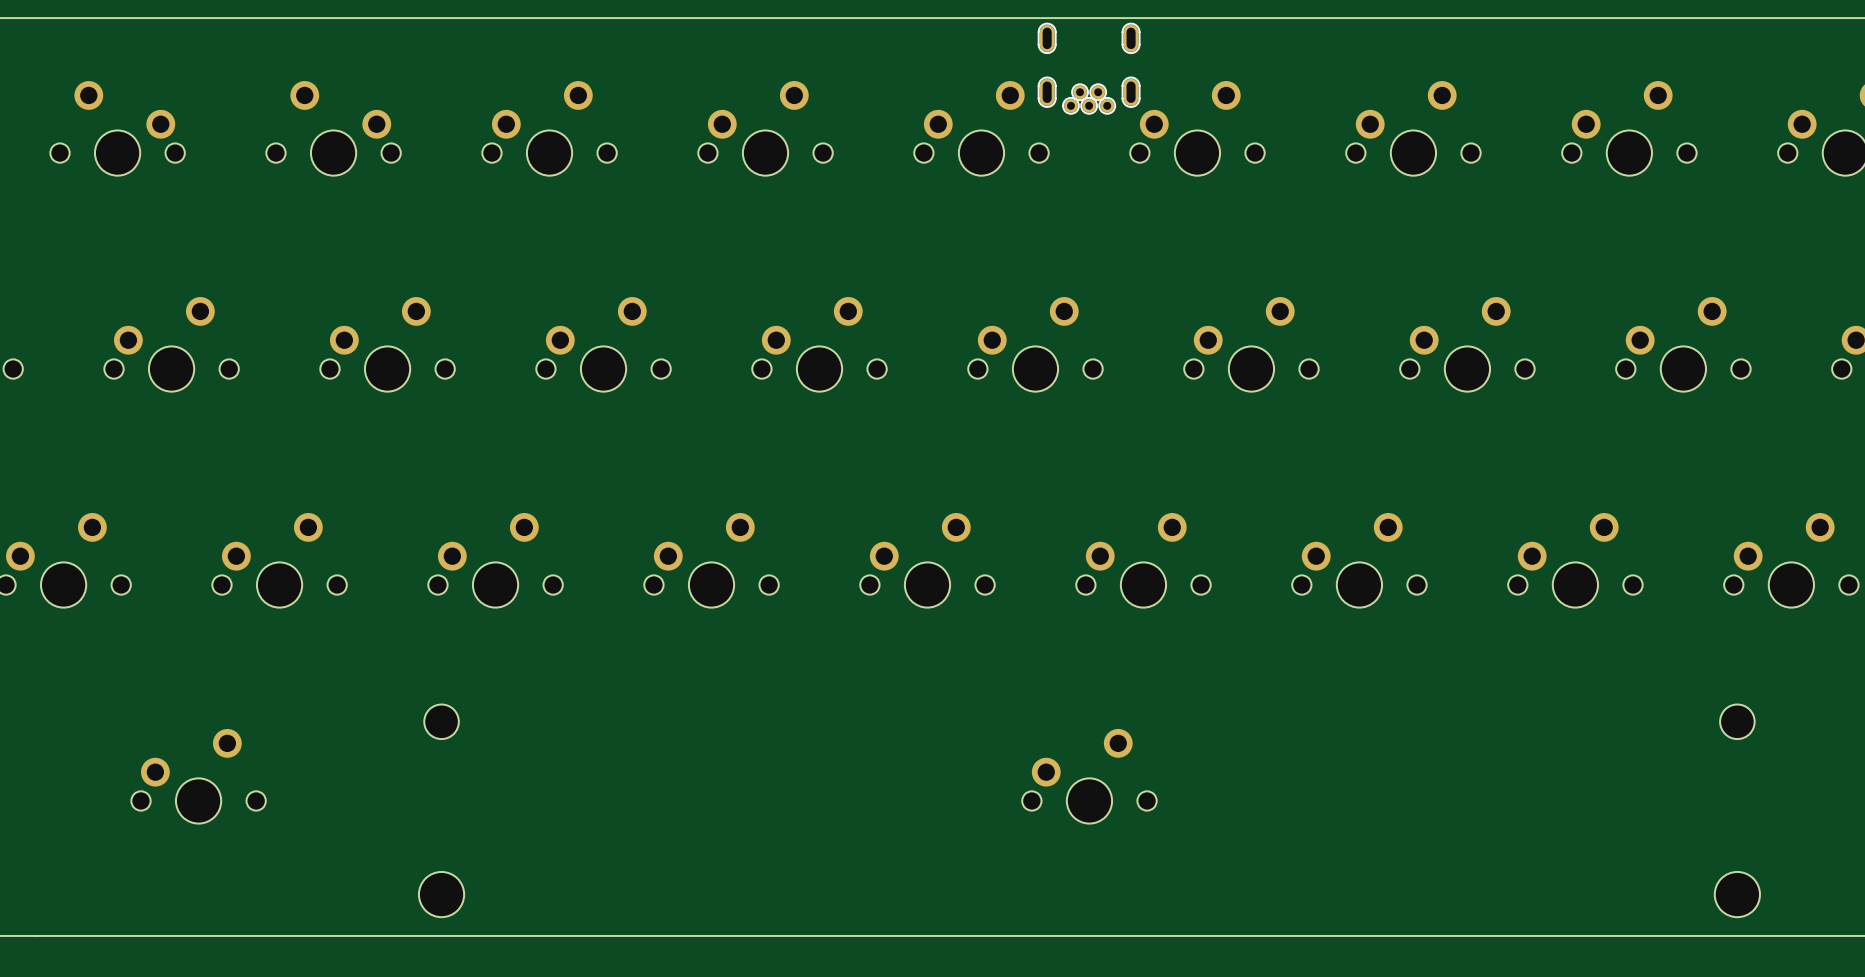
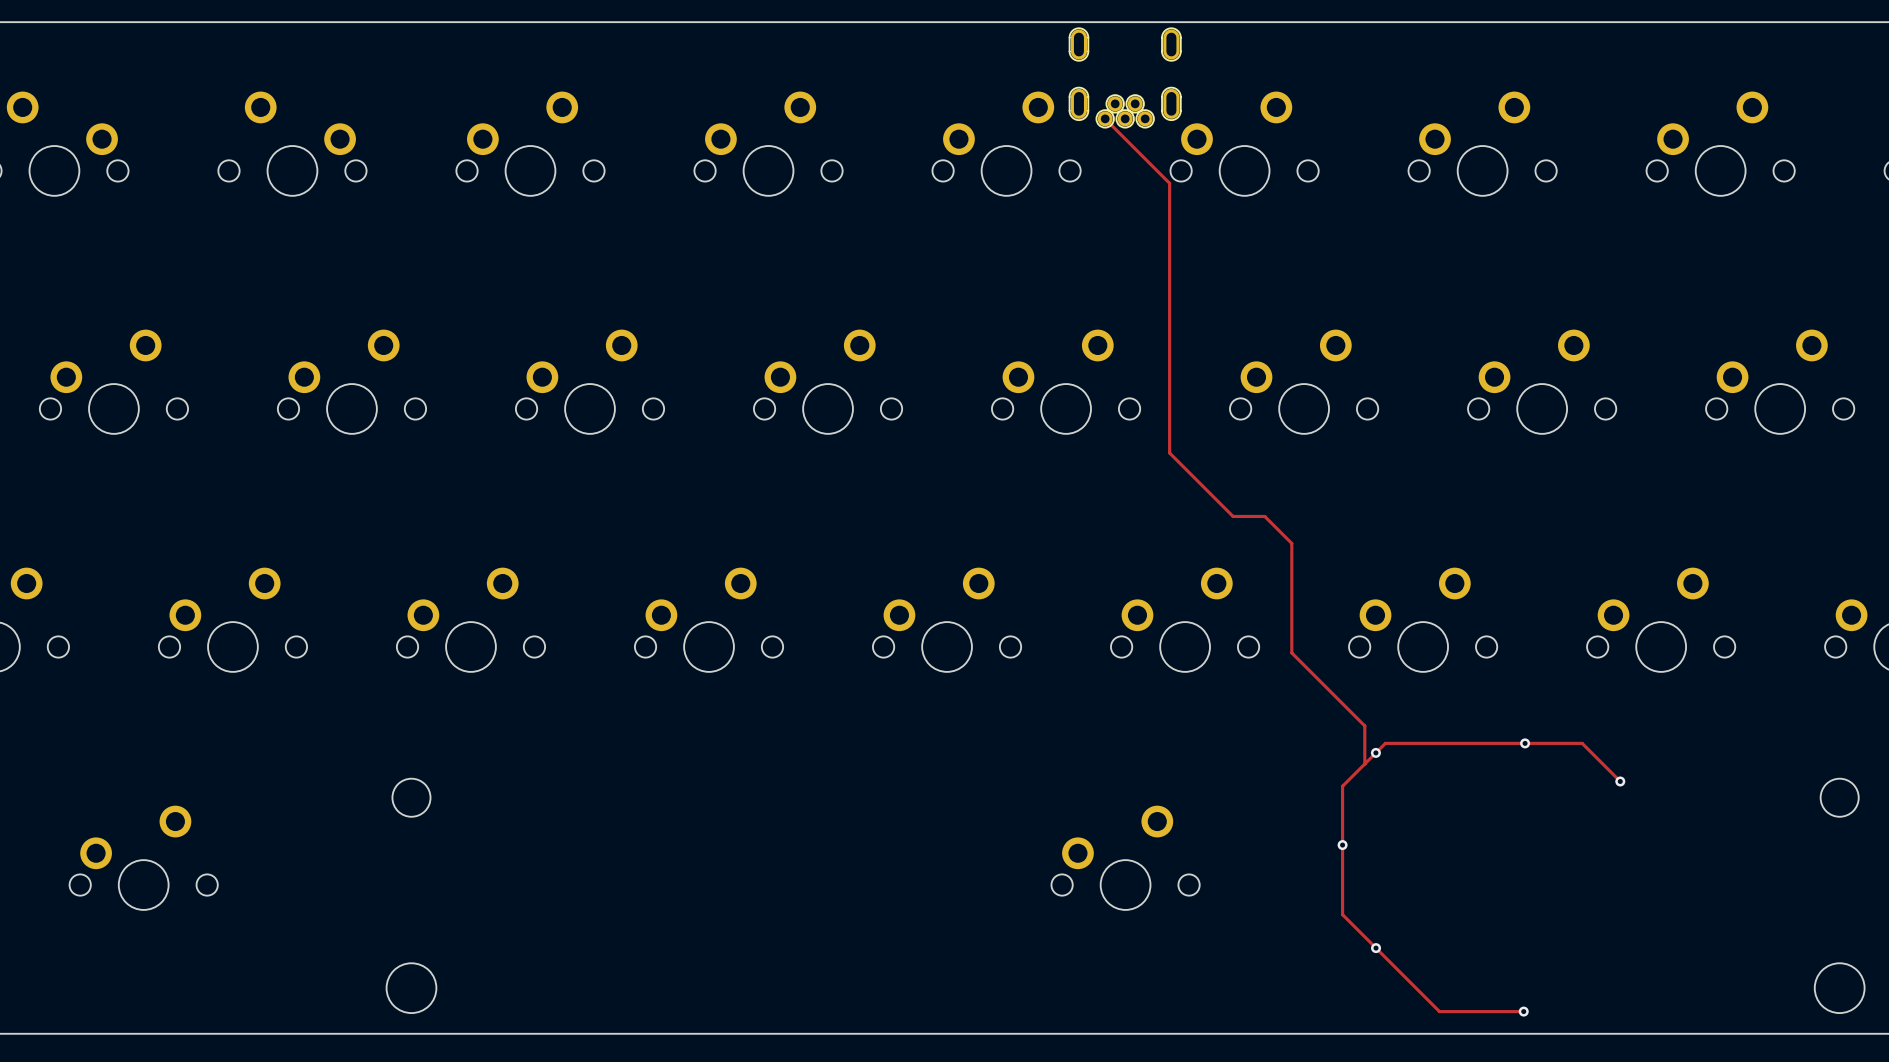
track: none -> (1105, 118) (1169, 183) (1169, 452) (1233, 516) (1264, 516) (1291, 543) (1291, 652) (1364, 725) (1364, 764)
via: none -> (1525, 743)
via: none -> (1375, 752)
track: none -> (1620, 781) (1582, 743) (1385, 743) (1342, 786) (1342, 914) (1439, 1011) (1523, 1011)
via: none -> (1620, 781)
via: none -> (1342, 845)
via: none -> (1376, 948)
via: none -> (1523, 1011)

